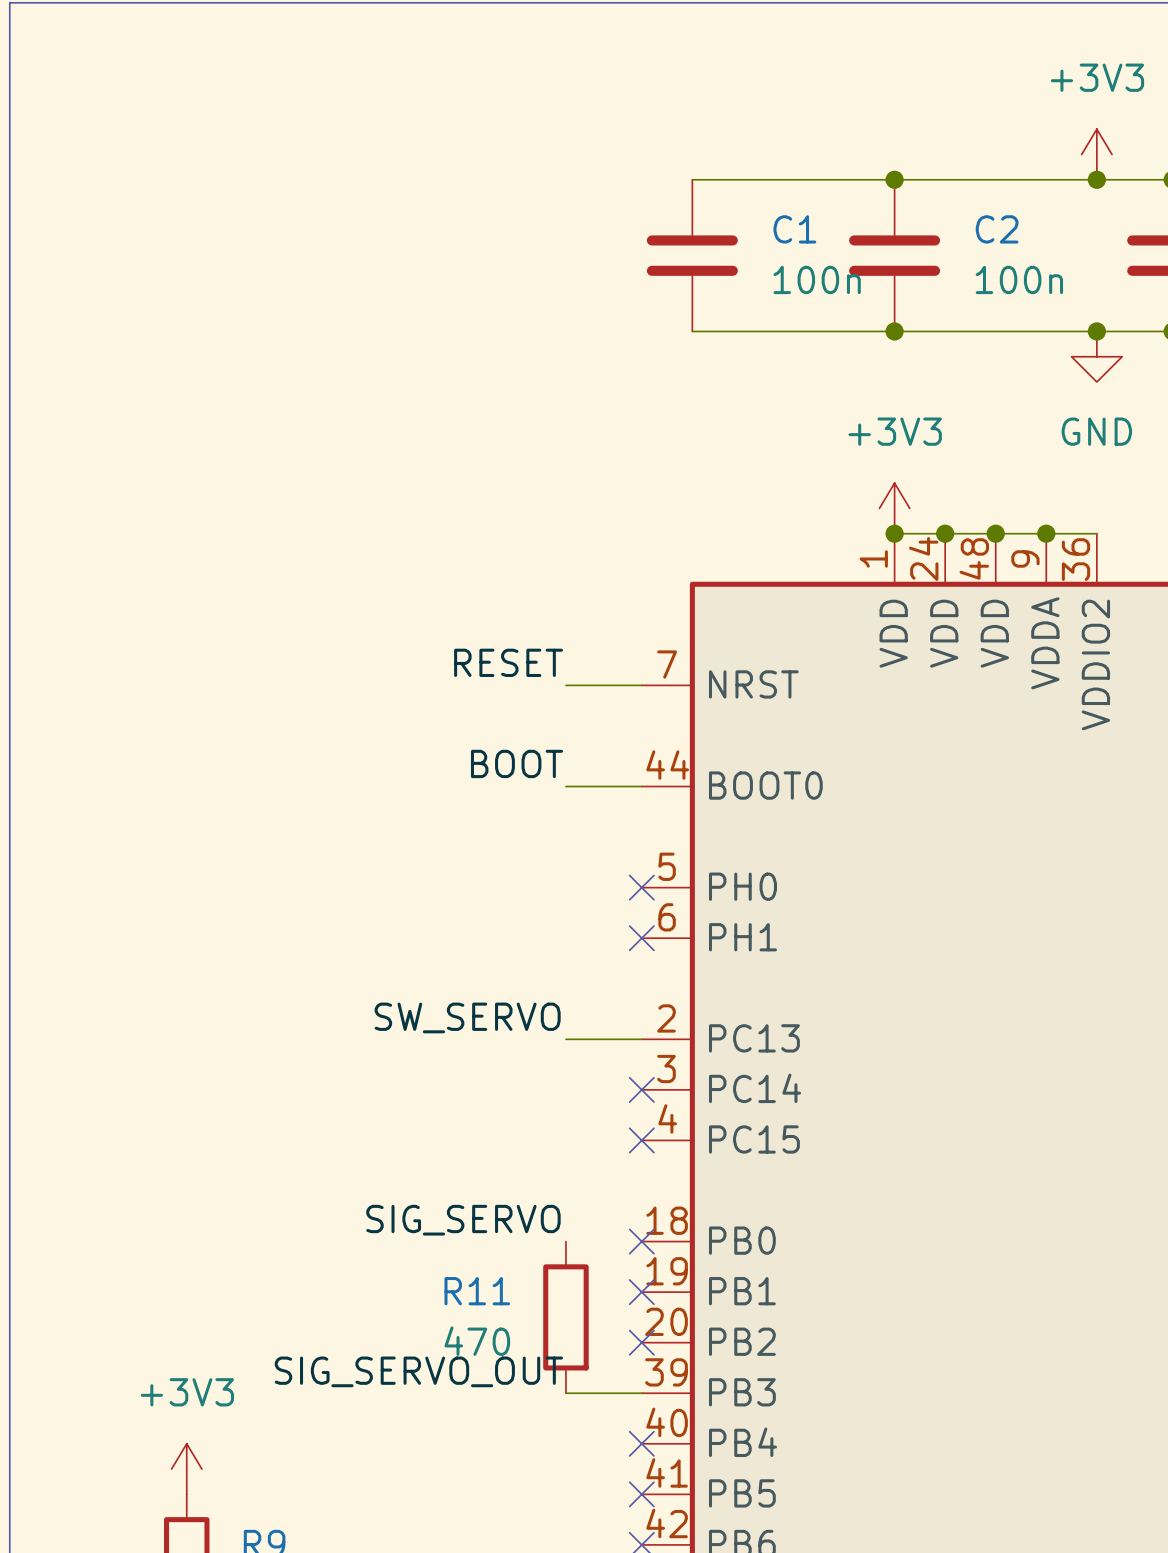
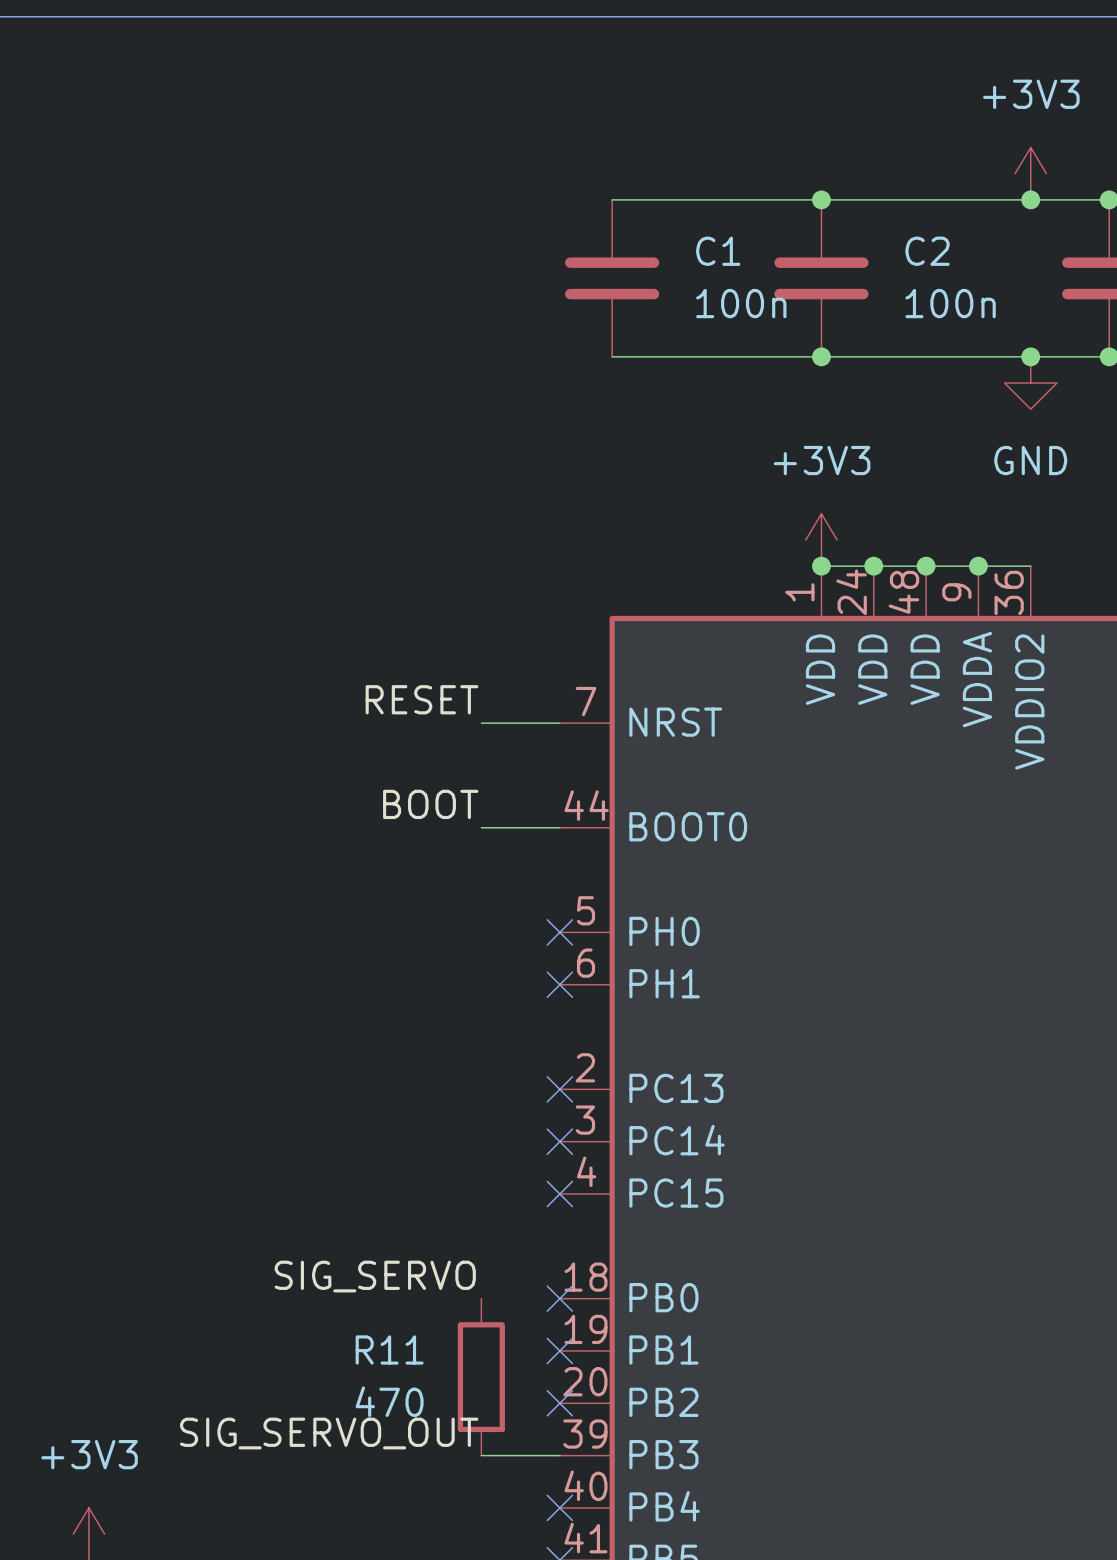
label: SW_SERVO (467, 1017) -> none
wire: (565, 1039) (641, 1039) -> none
no-connect mark: none -> (559, 1089)

